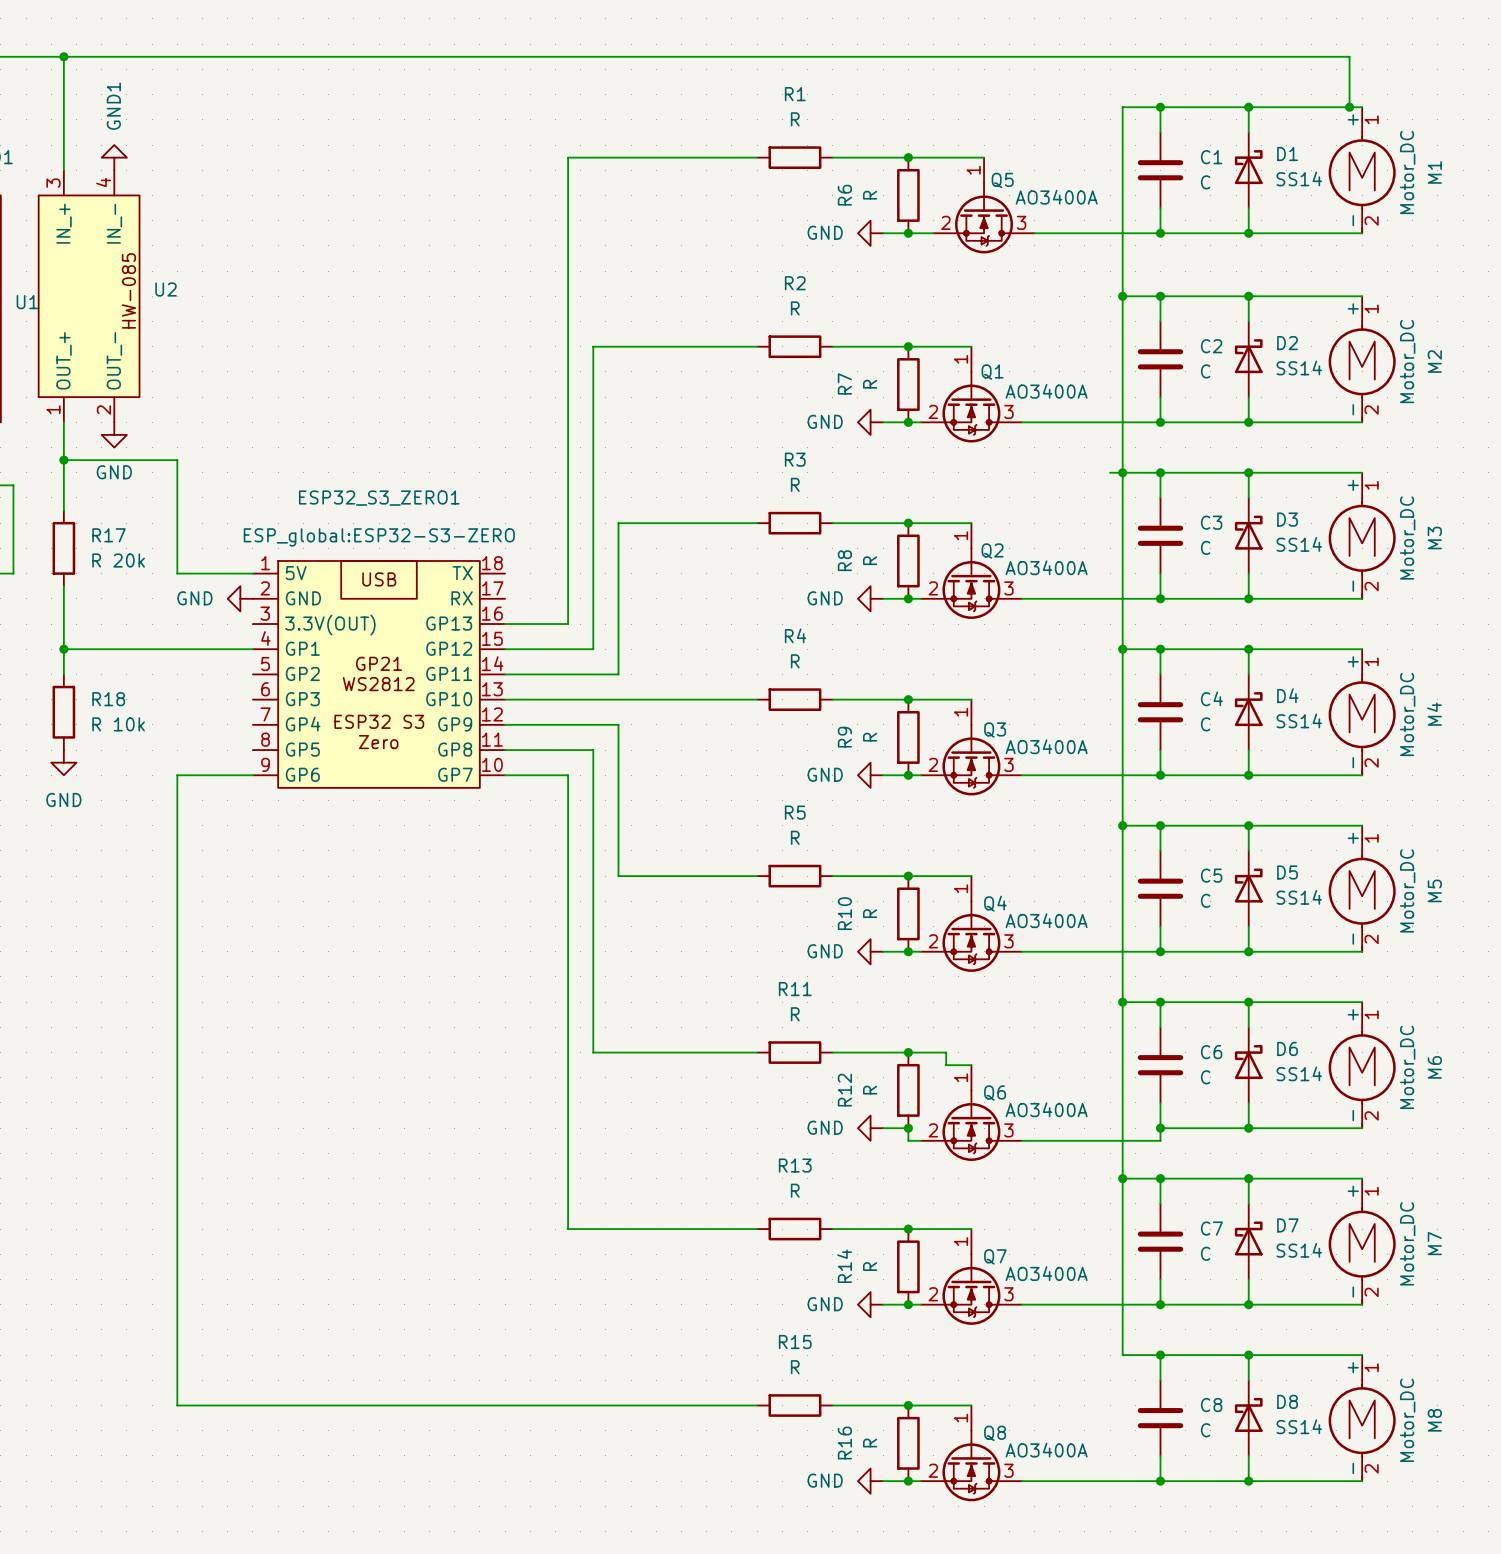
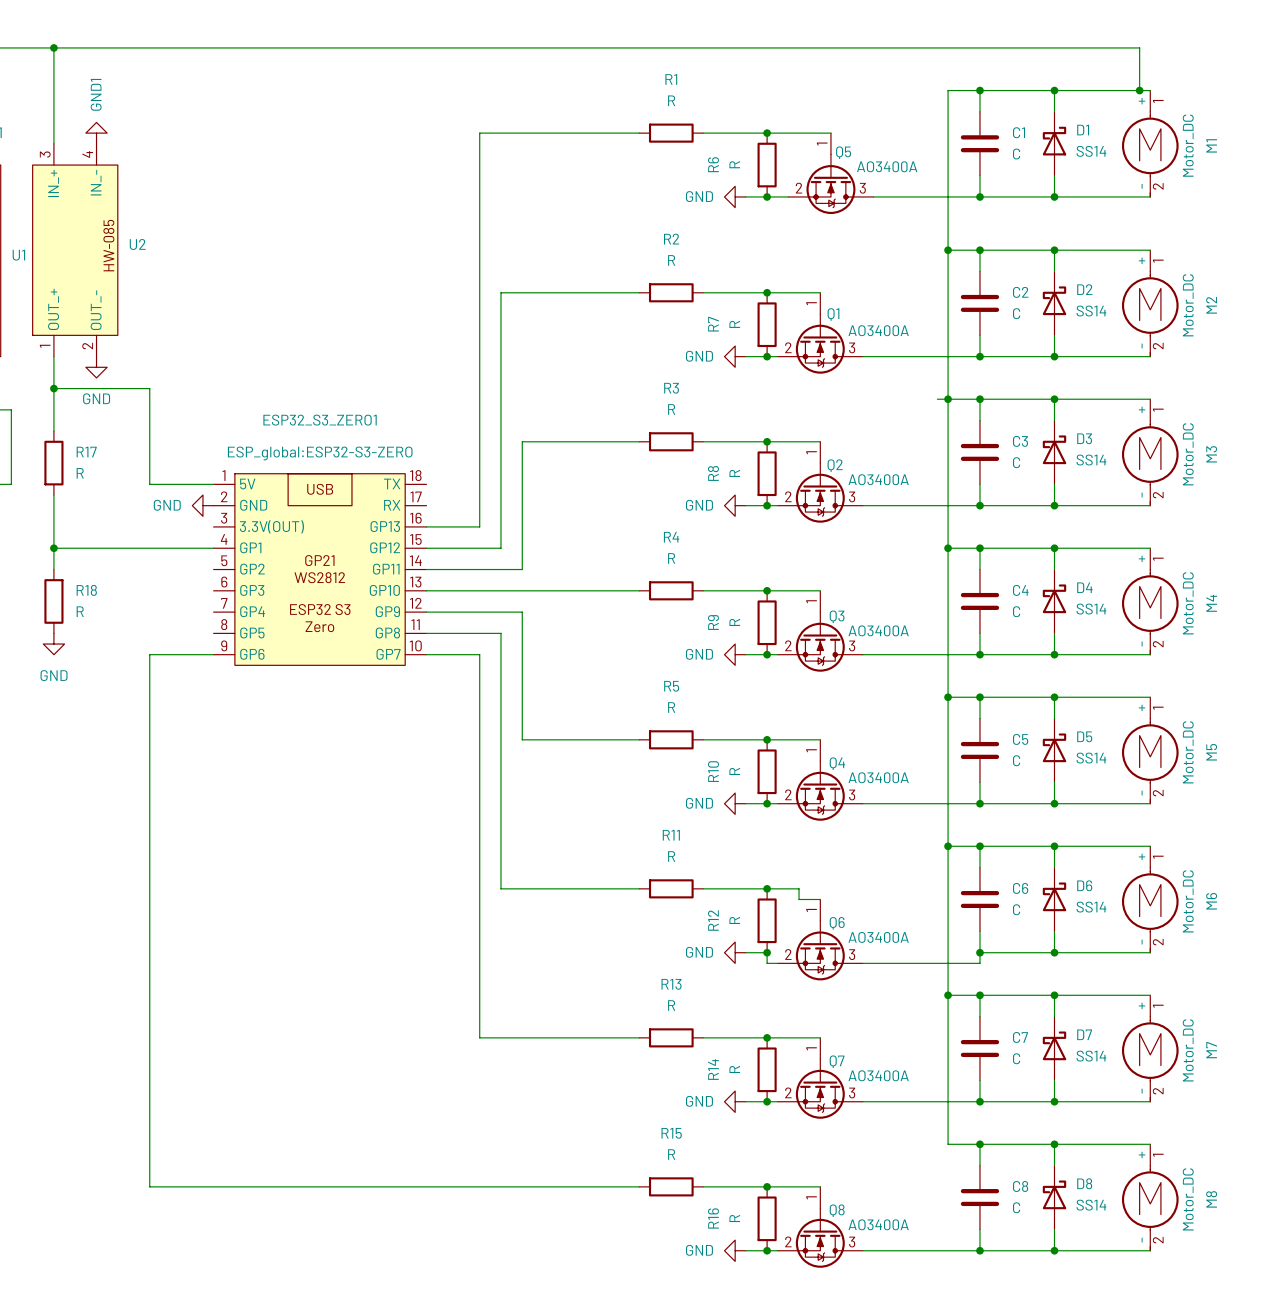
R17 value: R 20k (118, 560) -> R (80, 473)
R18 value: R 10k (118, 724) -> R (80, 611)

